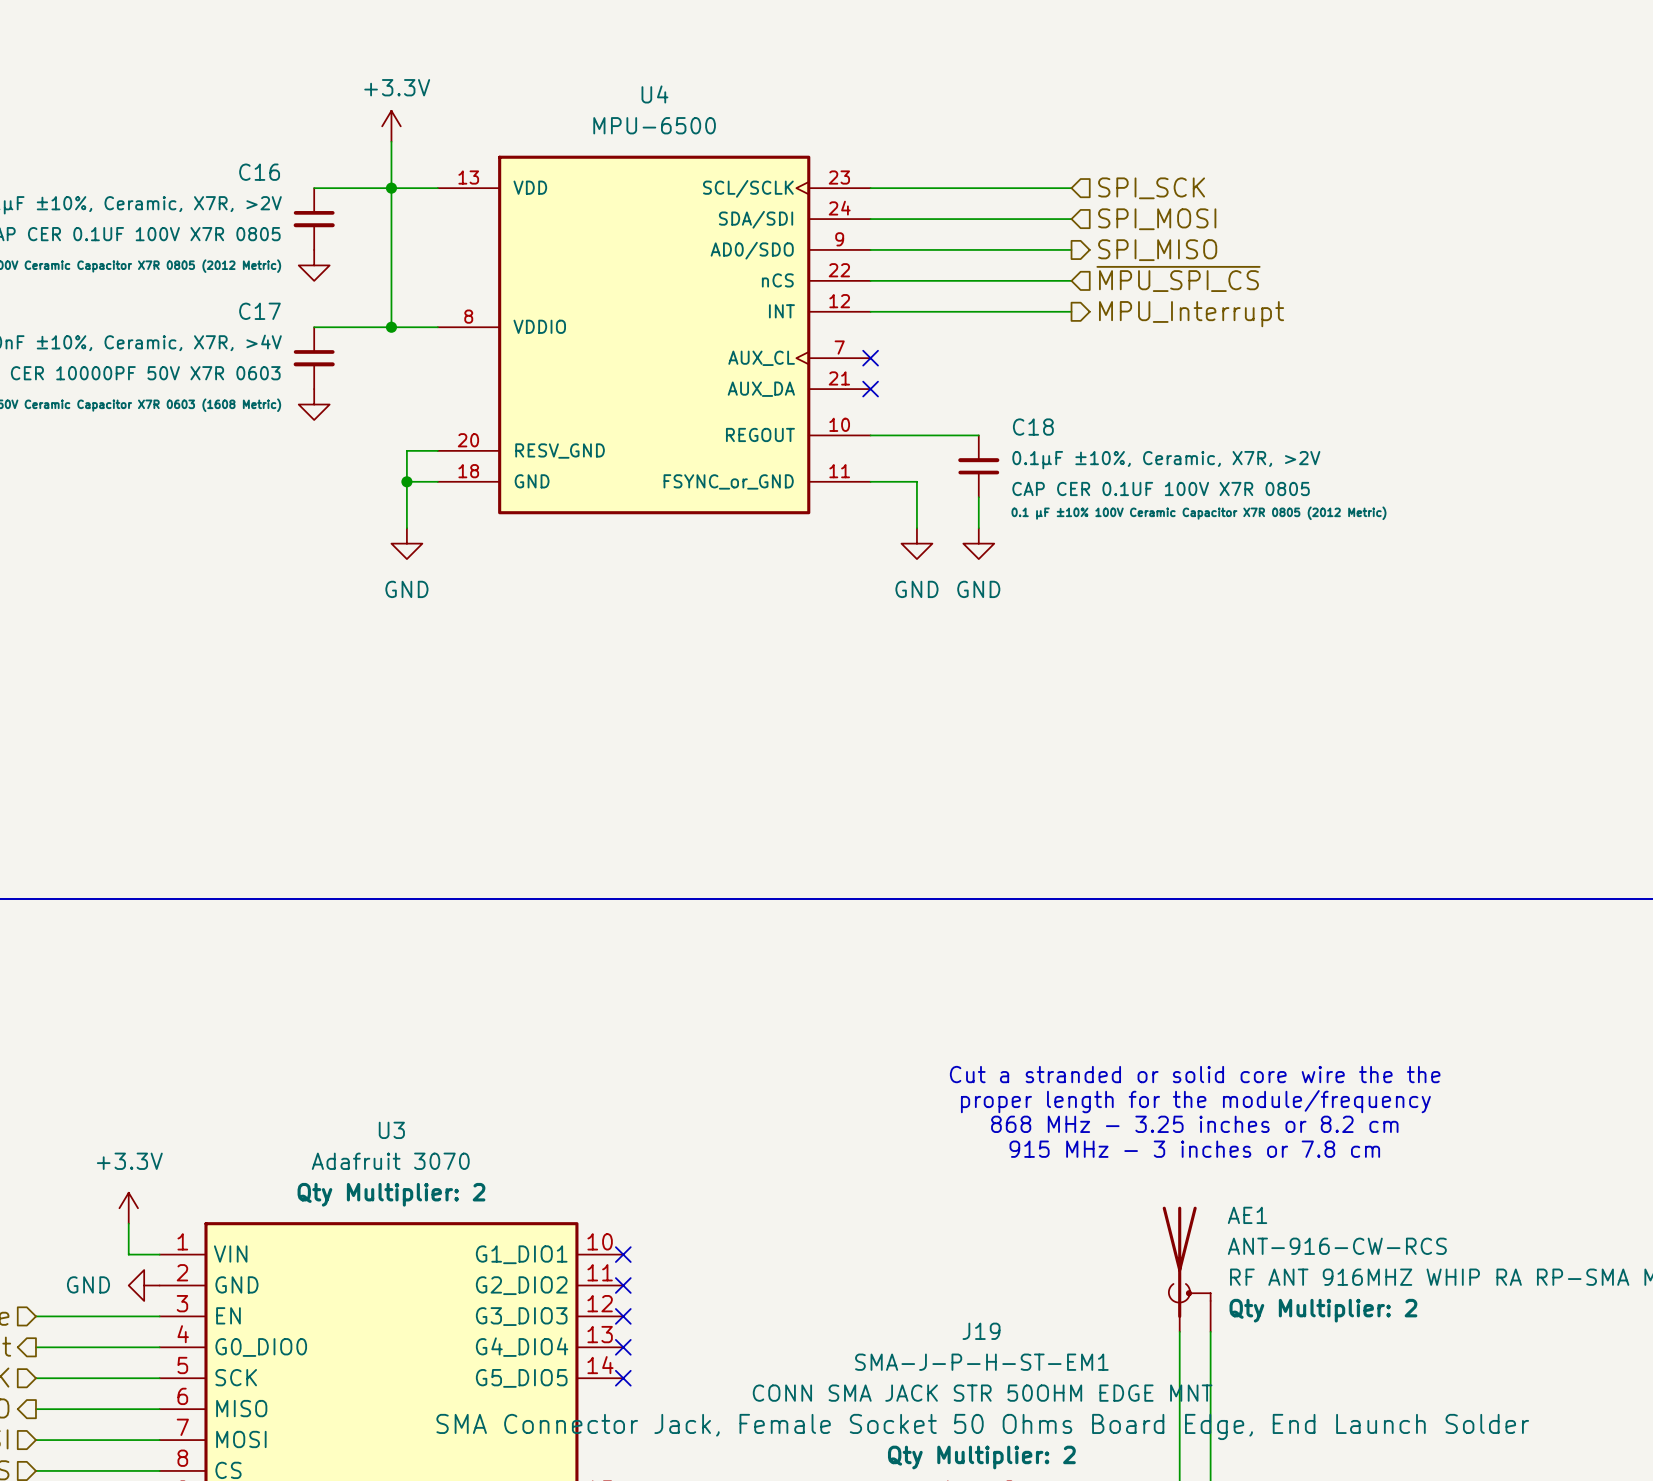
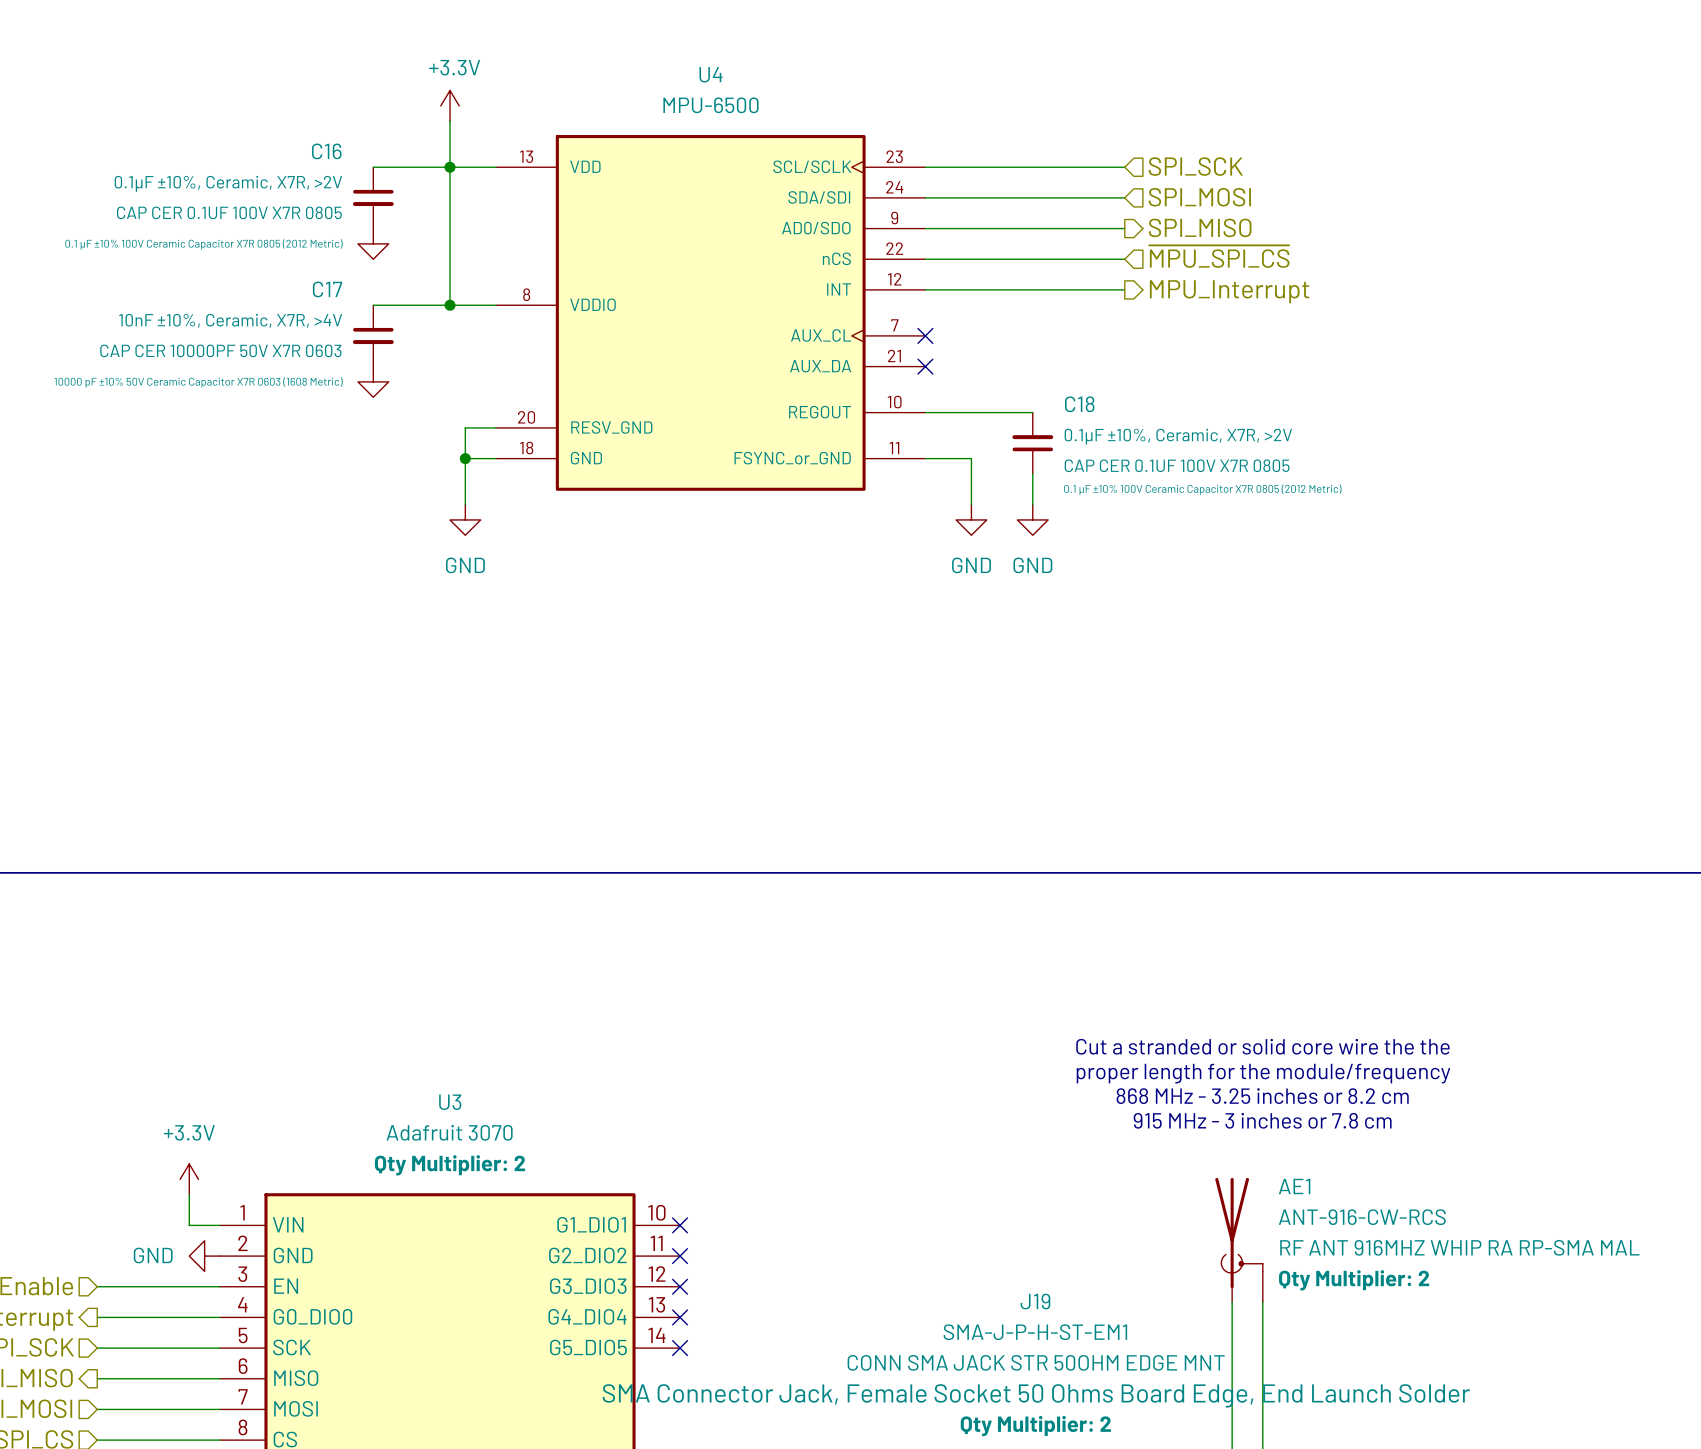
text position: Cut a stranded or solid core wire the the (1195, 1074) -> Cut a stranded or solid core wire the the (1262, 1046)
text position: proper length for the module/frequency (1195, 1101) -> proper length for the module/frequency (1263, 1073)
text position: 868 MHz - 3.25 inches or 8.2 cm (1194, 1124) -> 868 MHz - 3.25 inches or 8.2 cm (1262, 1096)
text position: 915 MHz - 3 inches or 7.8 cm (1194, 1149) -> 915 MHz - 3 inches or 7.8 cm (1262, 1120)

